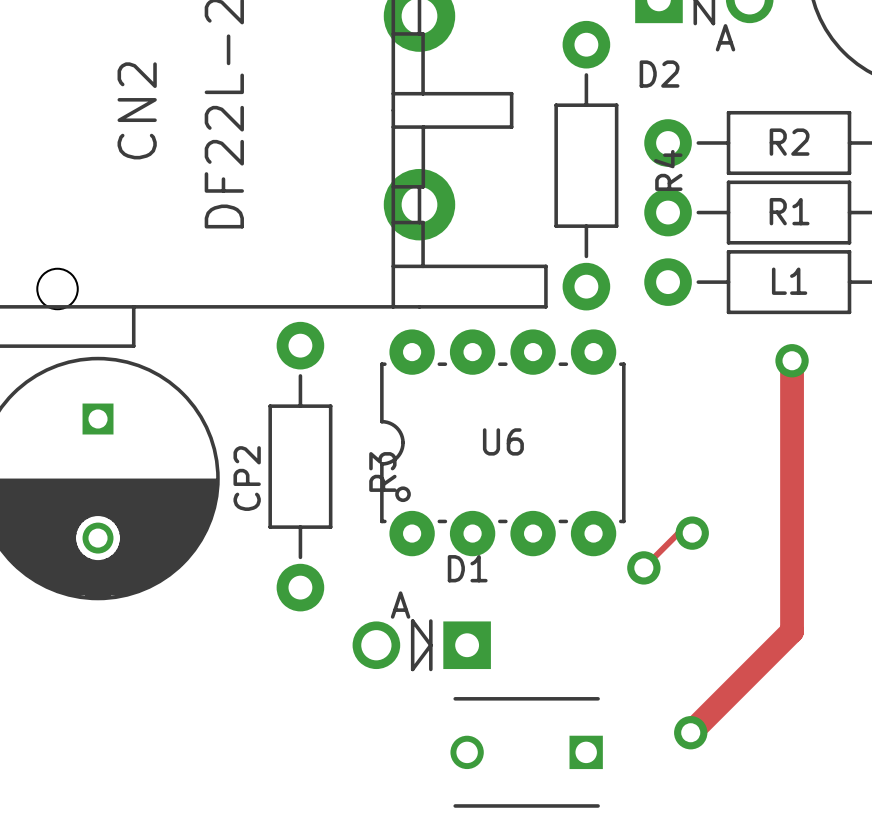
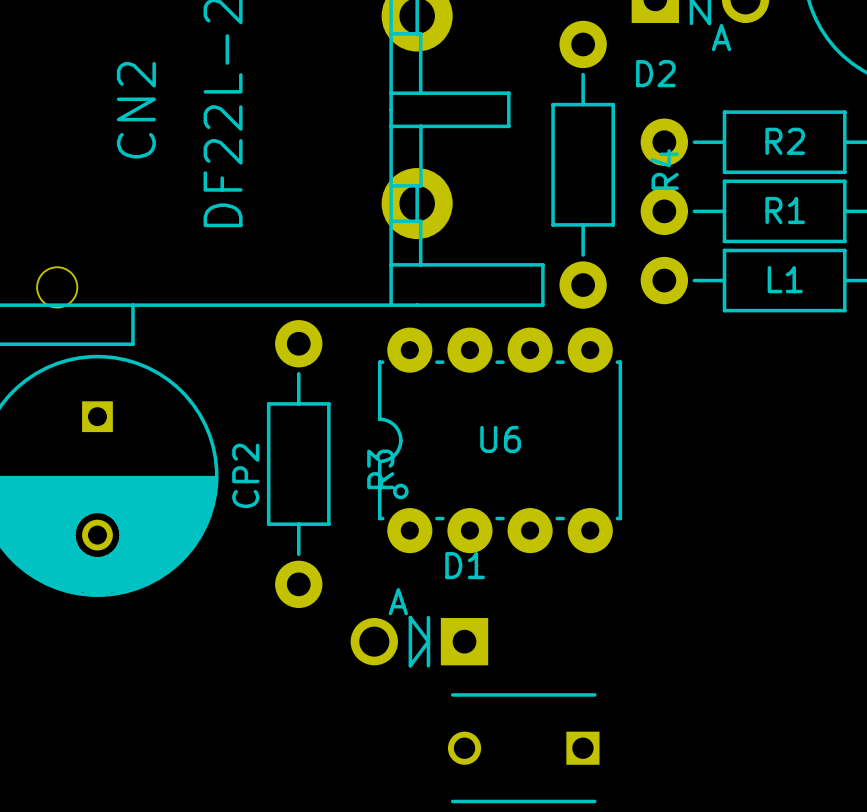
track: (792, 360) (792, 631) (690, 732) -> none
via: (792, 360) -> none
track: (692, 533) (678, 533) (643, 567) -> none
via: (692, 533) -> none
via: (643, 567) -> none
via: (690, 732) -> none

